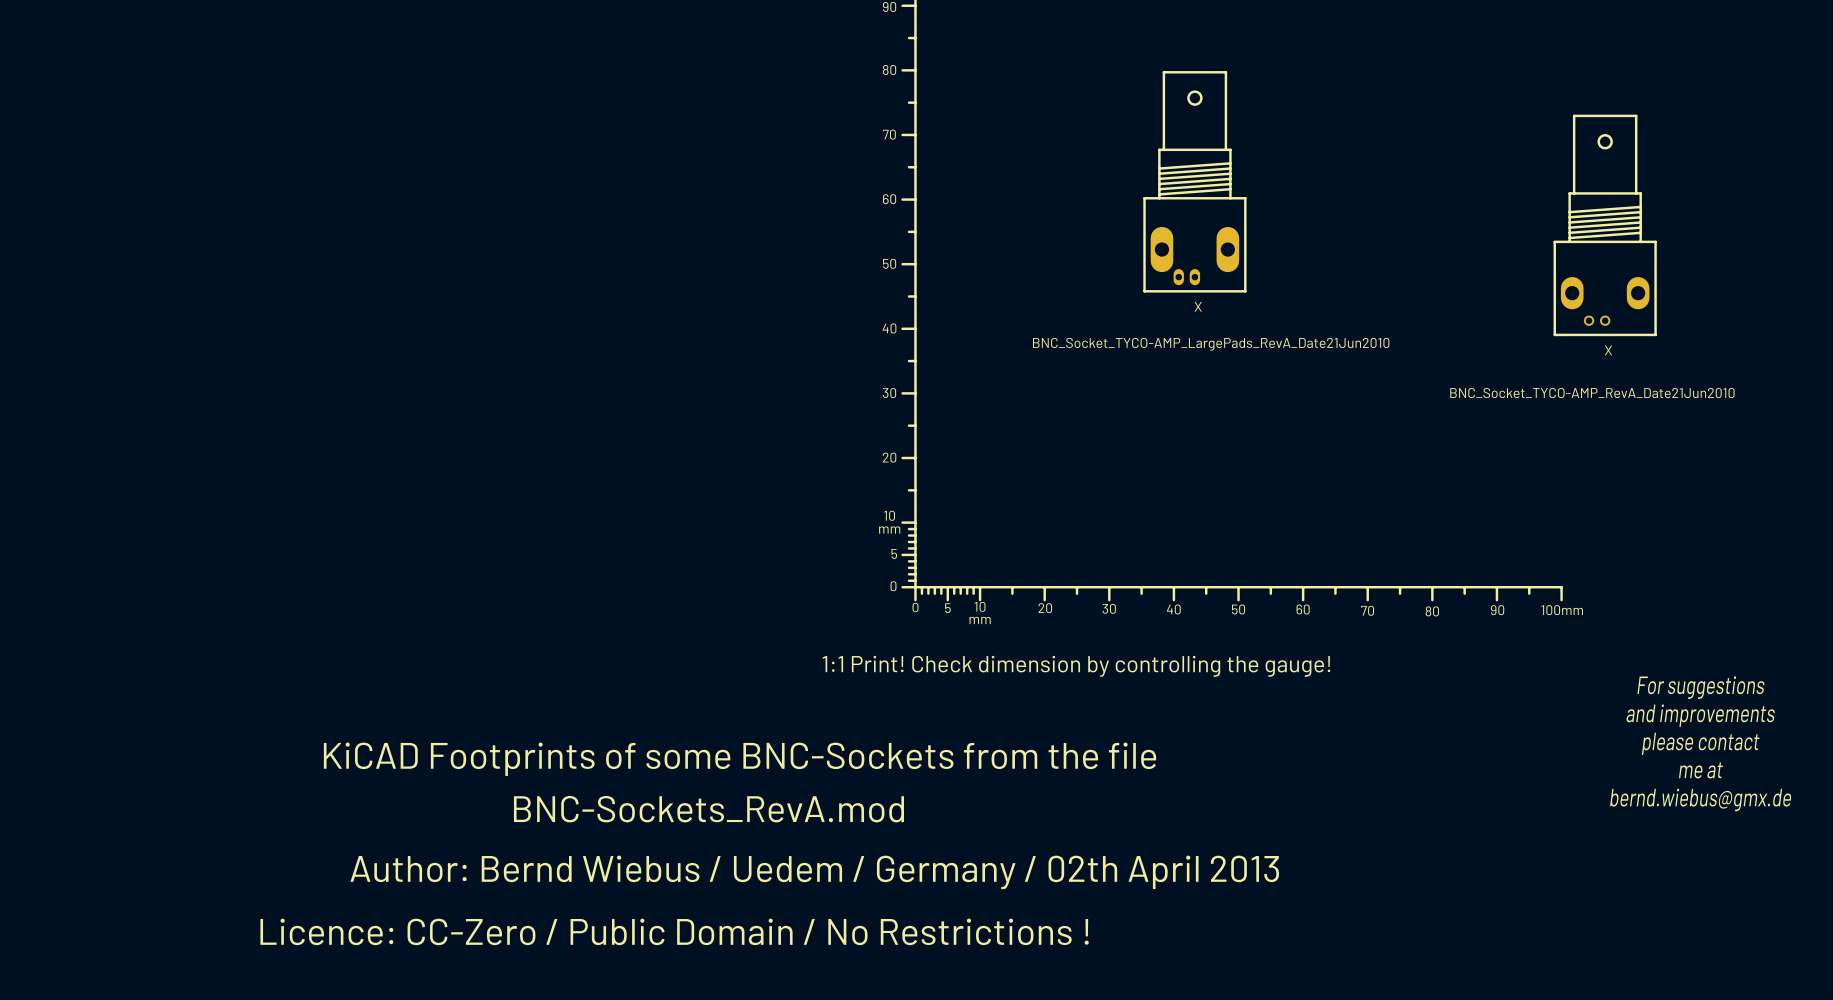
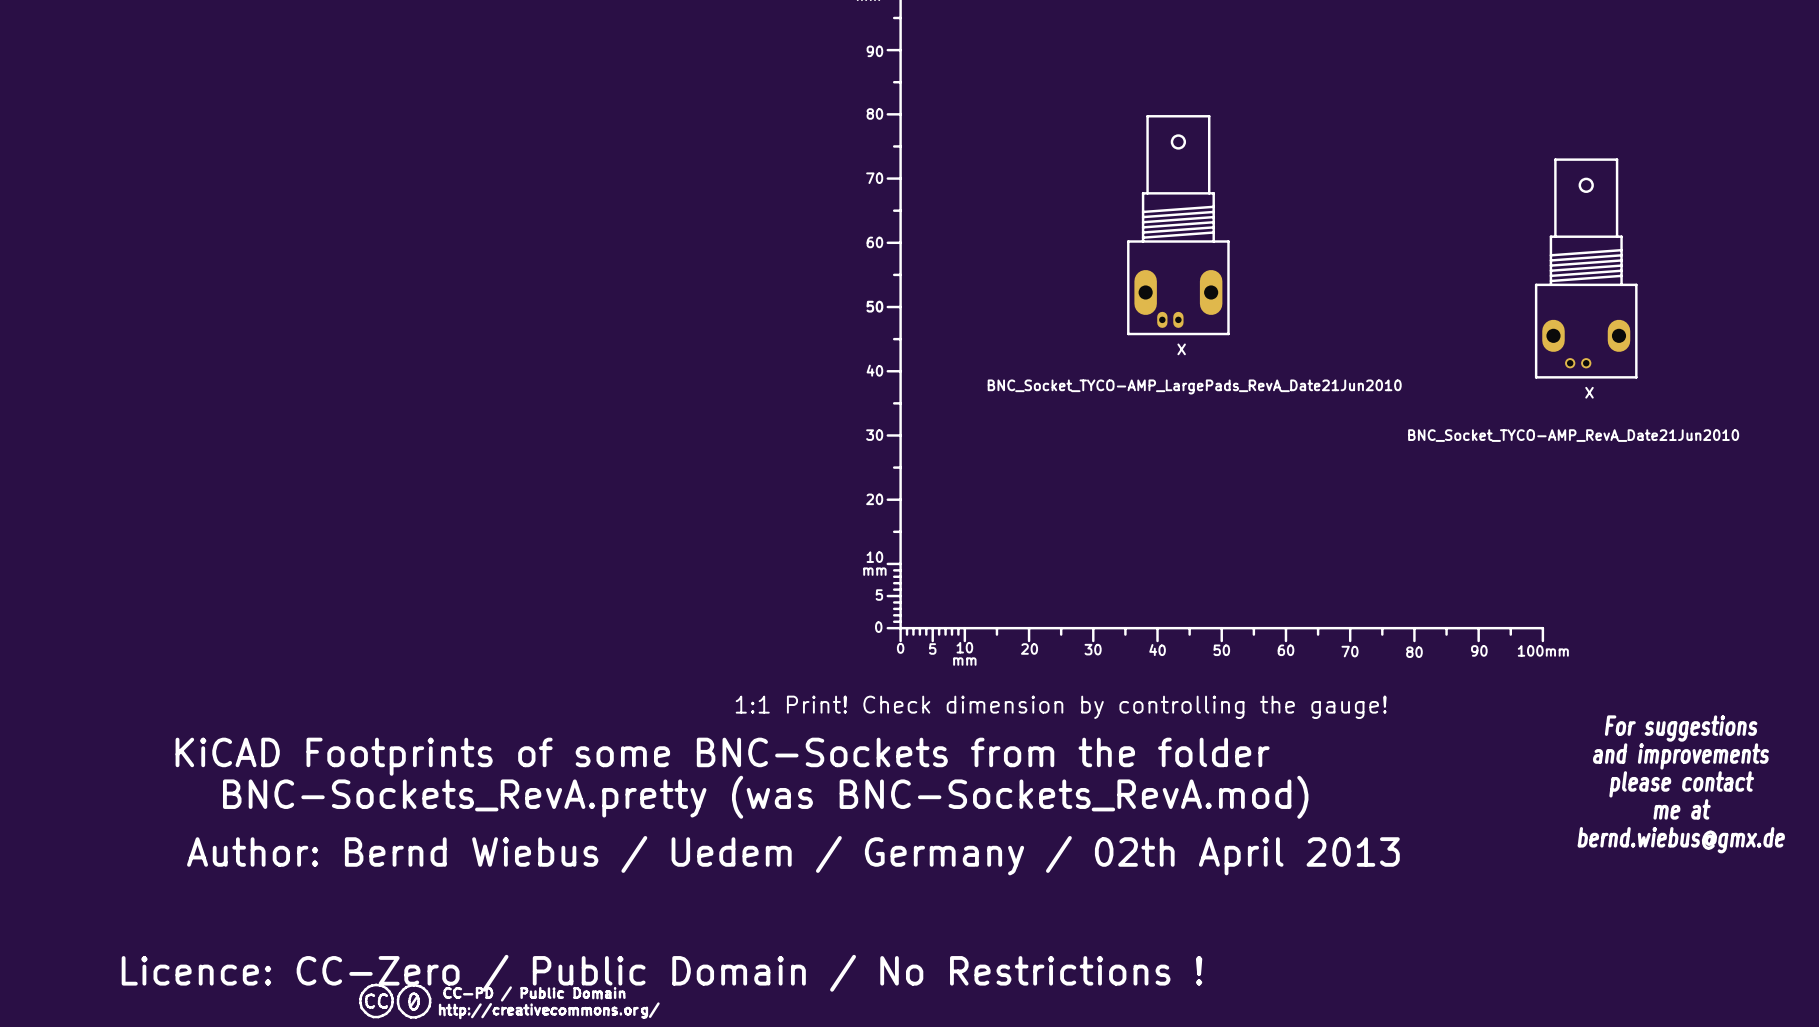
text: none -> BNC-Sockets_RevA.pretty (was BNC-Sockets_RevA.mod) (765, 797)
text: KiCAD Footprints of some BNC-Sockets from the file (740, 759) -> KiCAD Footprints of some BNC-Sockets from the folder (722, 756)
text: BNC-Sockets_RevA.mod (708, 809) -> none
text position: Author: Bernd Wiebus / Uedem / Germany / 02th April 2013 (814, 872) -> Author: Bernd Wiebus / Uedem / Germany / 02th April 2013 (793, 855)
drawing: none -> [359, 983, 660, 1020]

